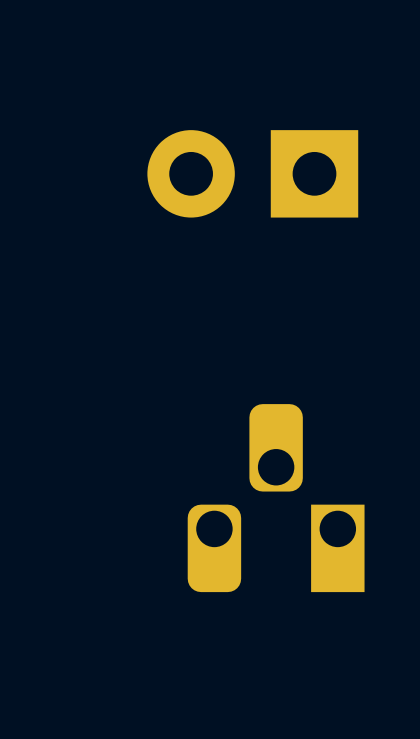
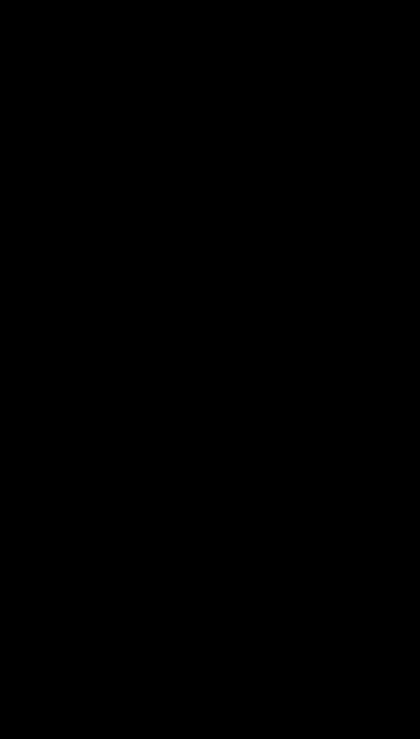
part: (252, 173) -> none
part: (276, 498) -> none

